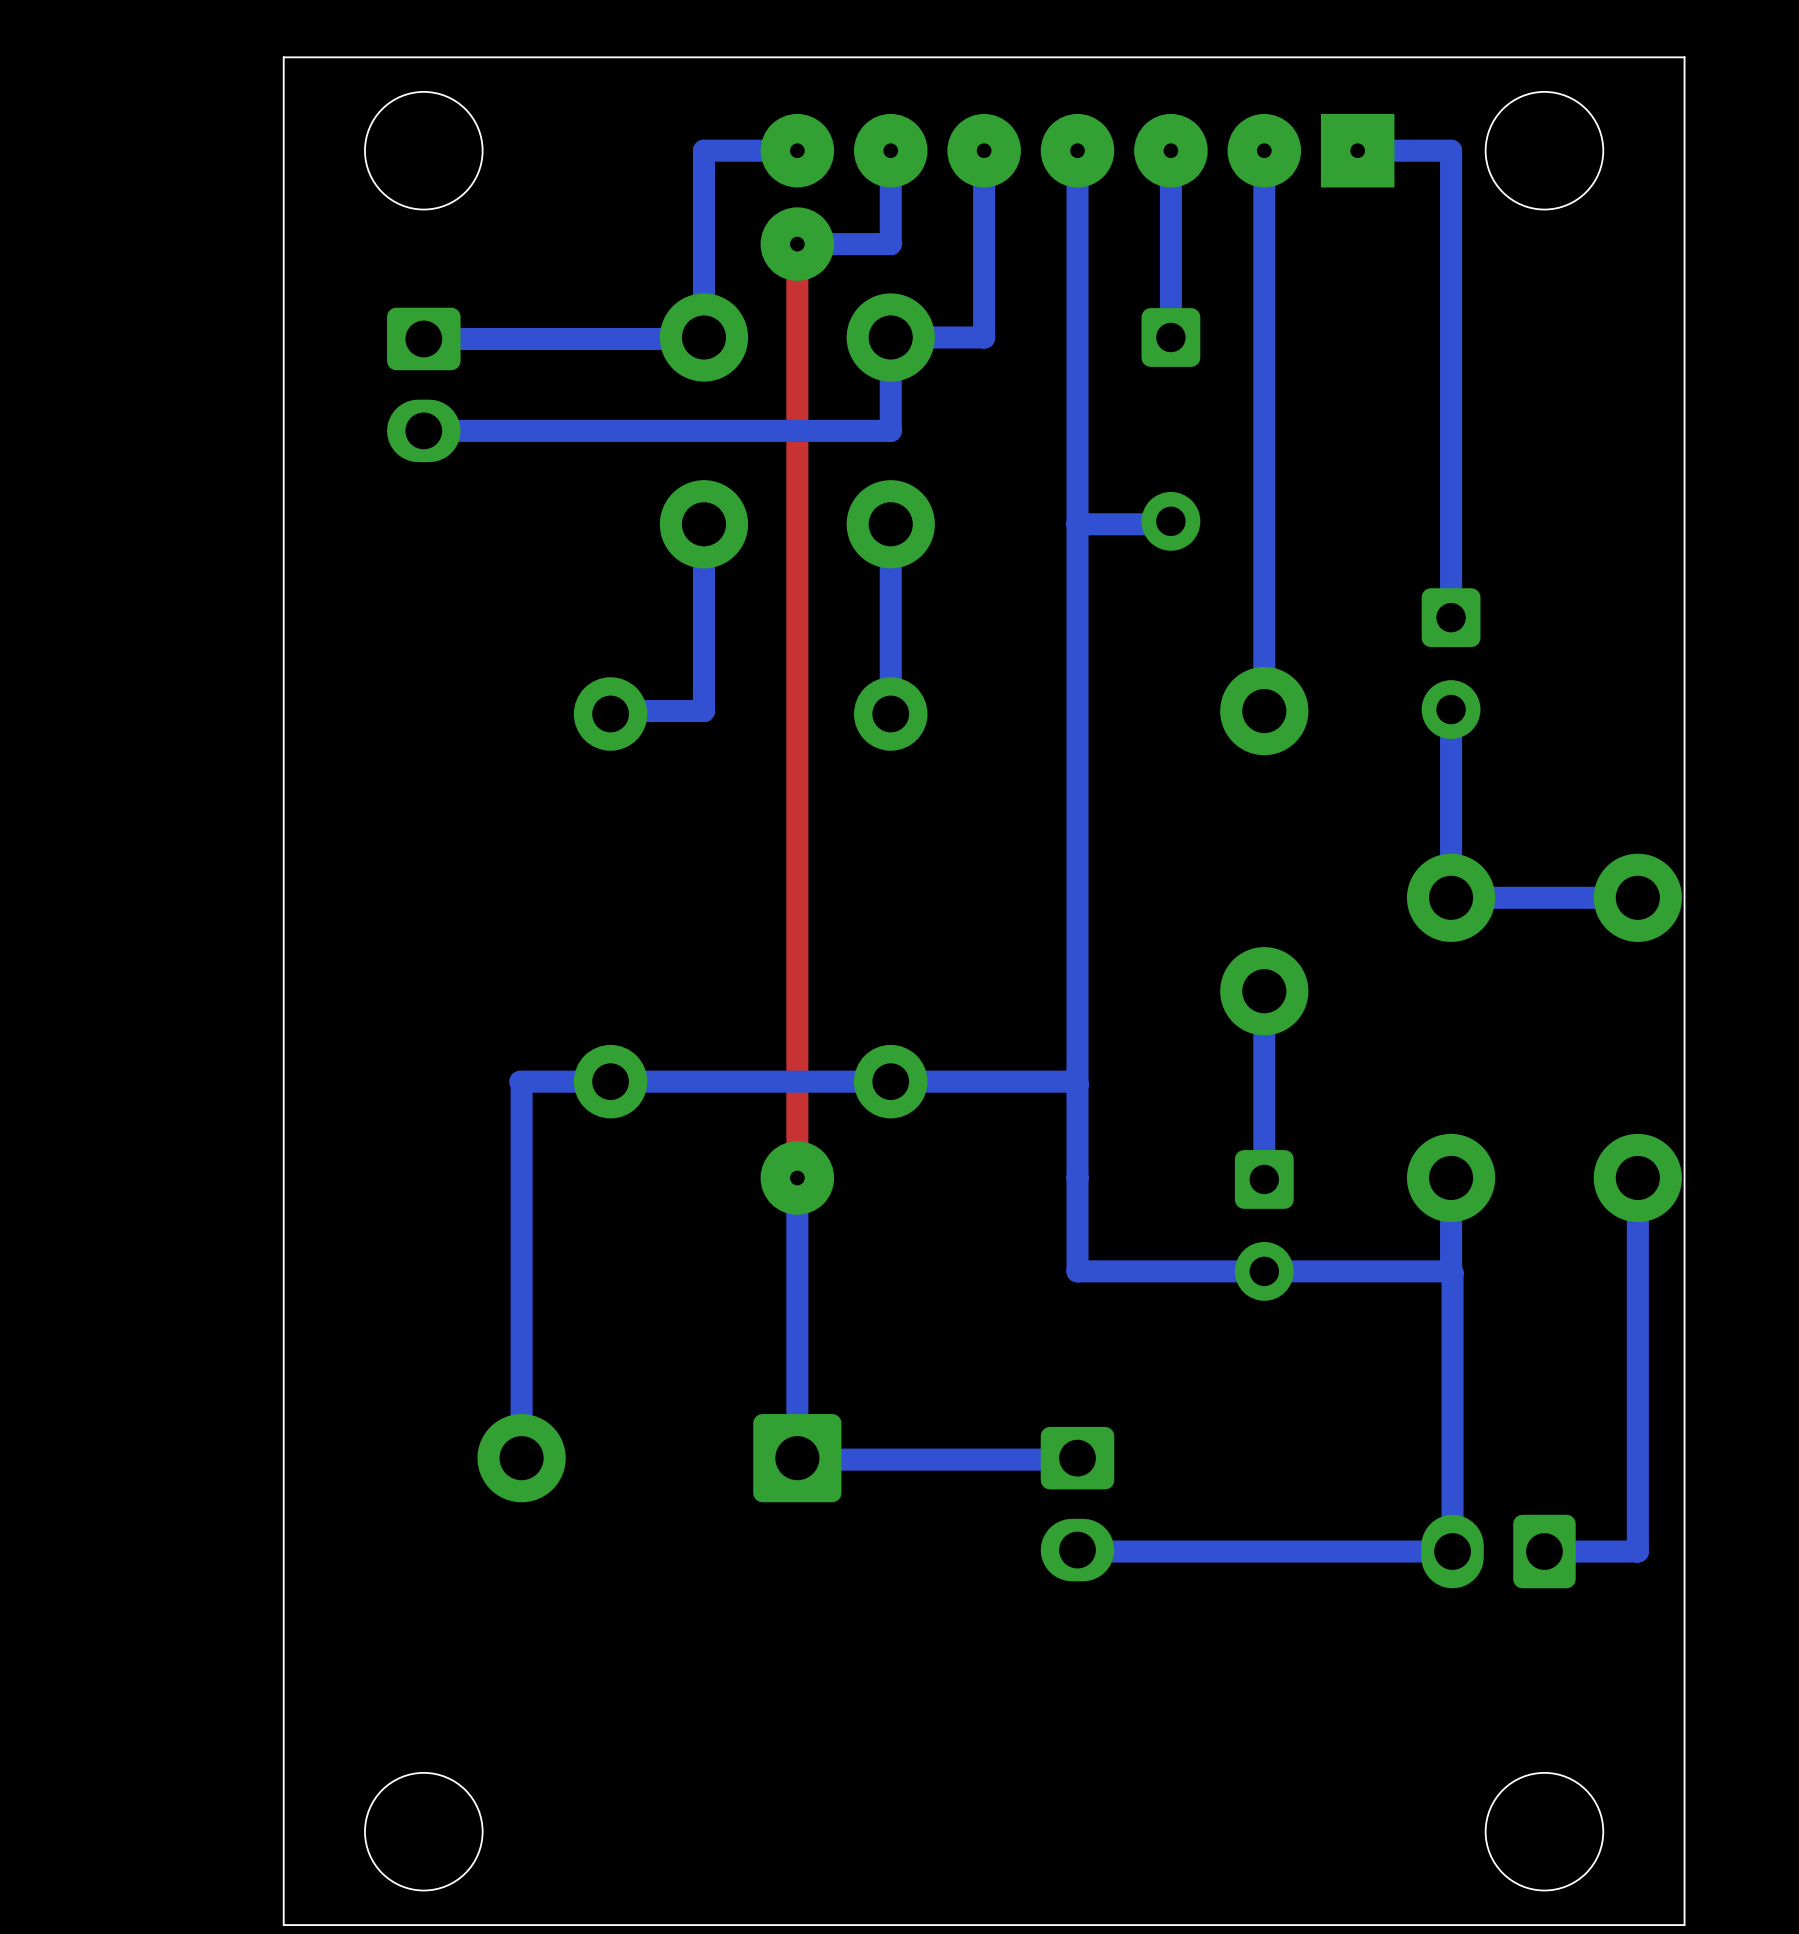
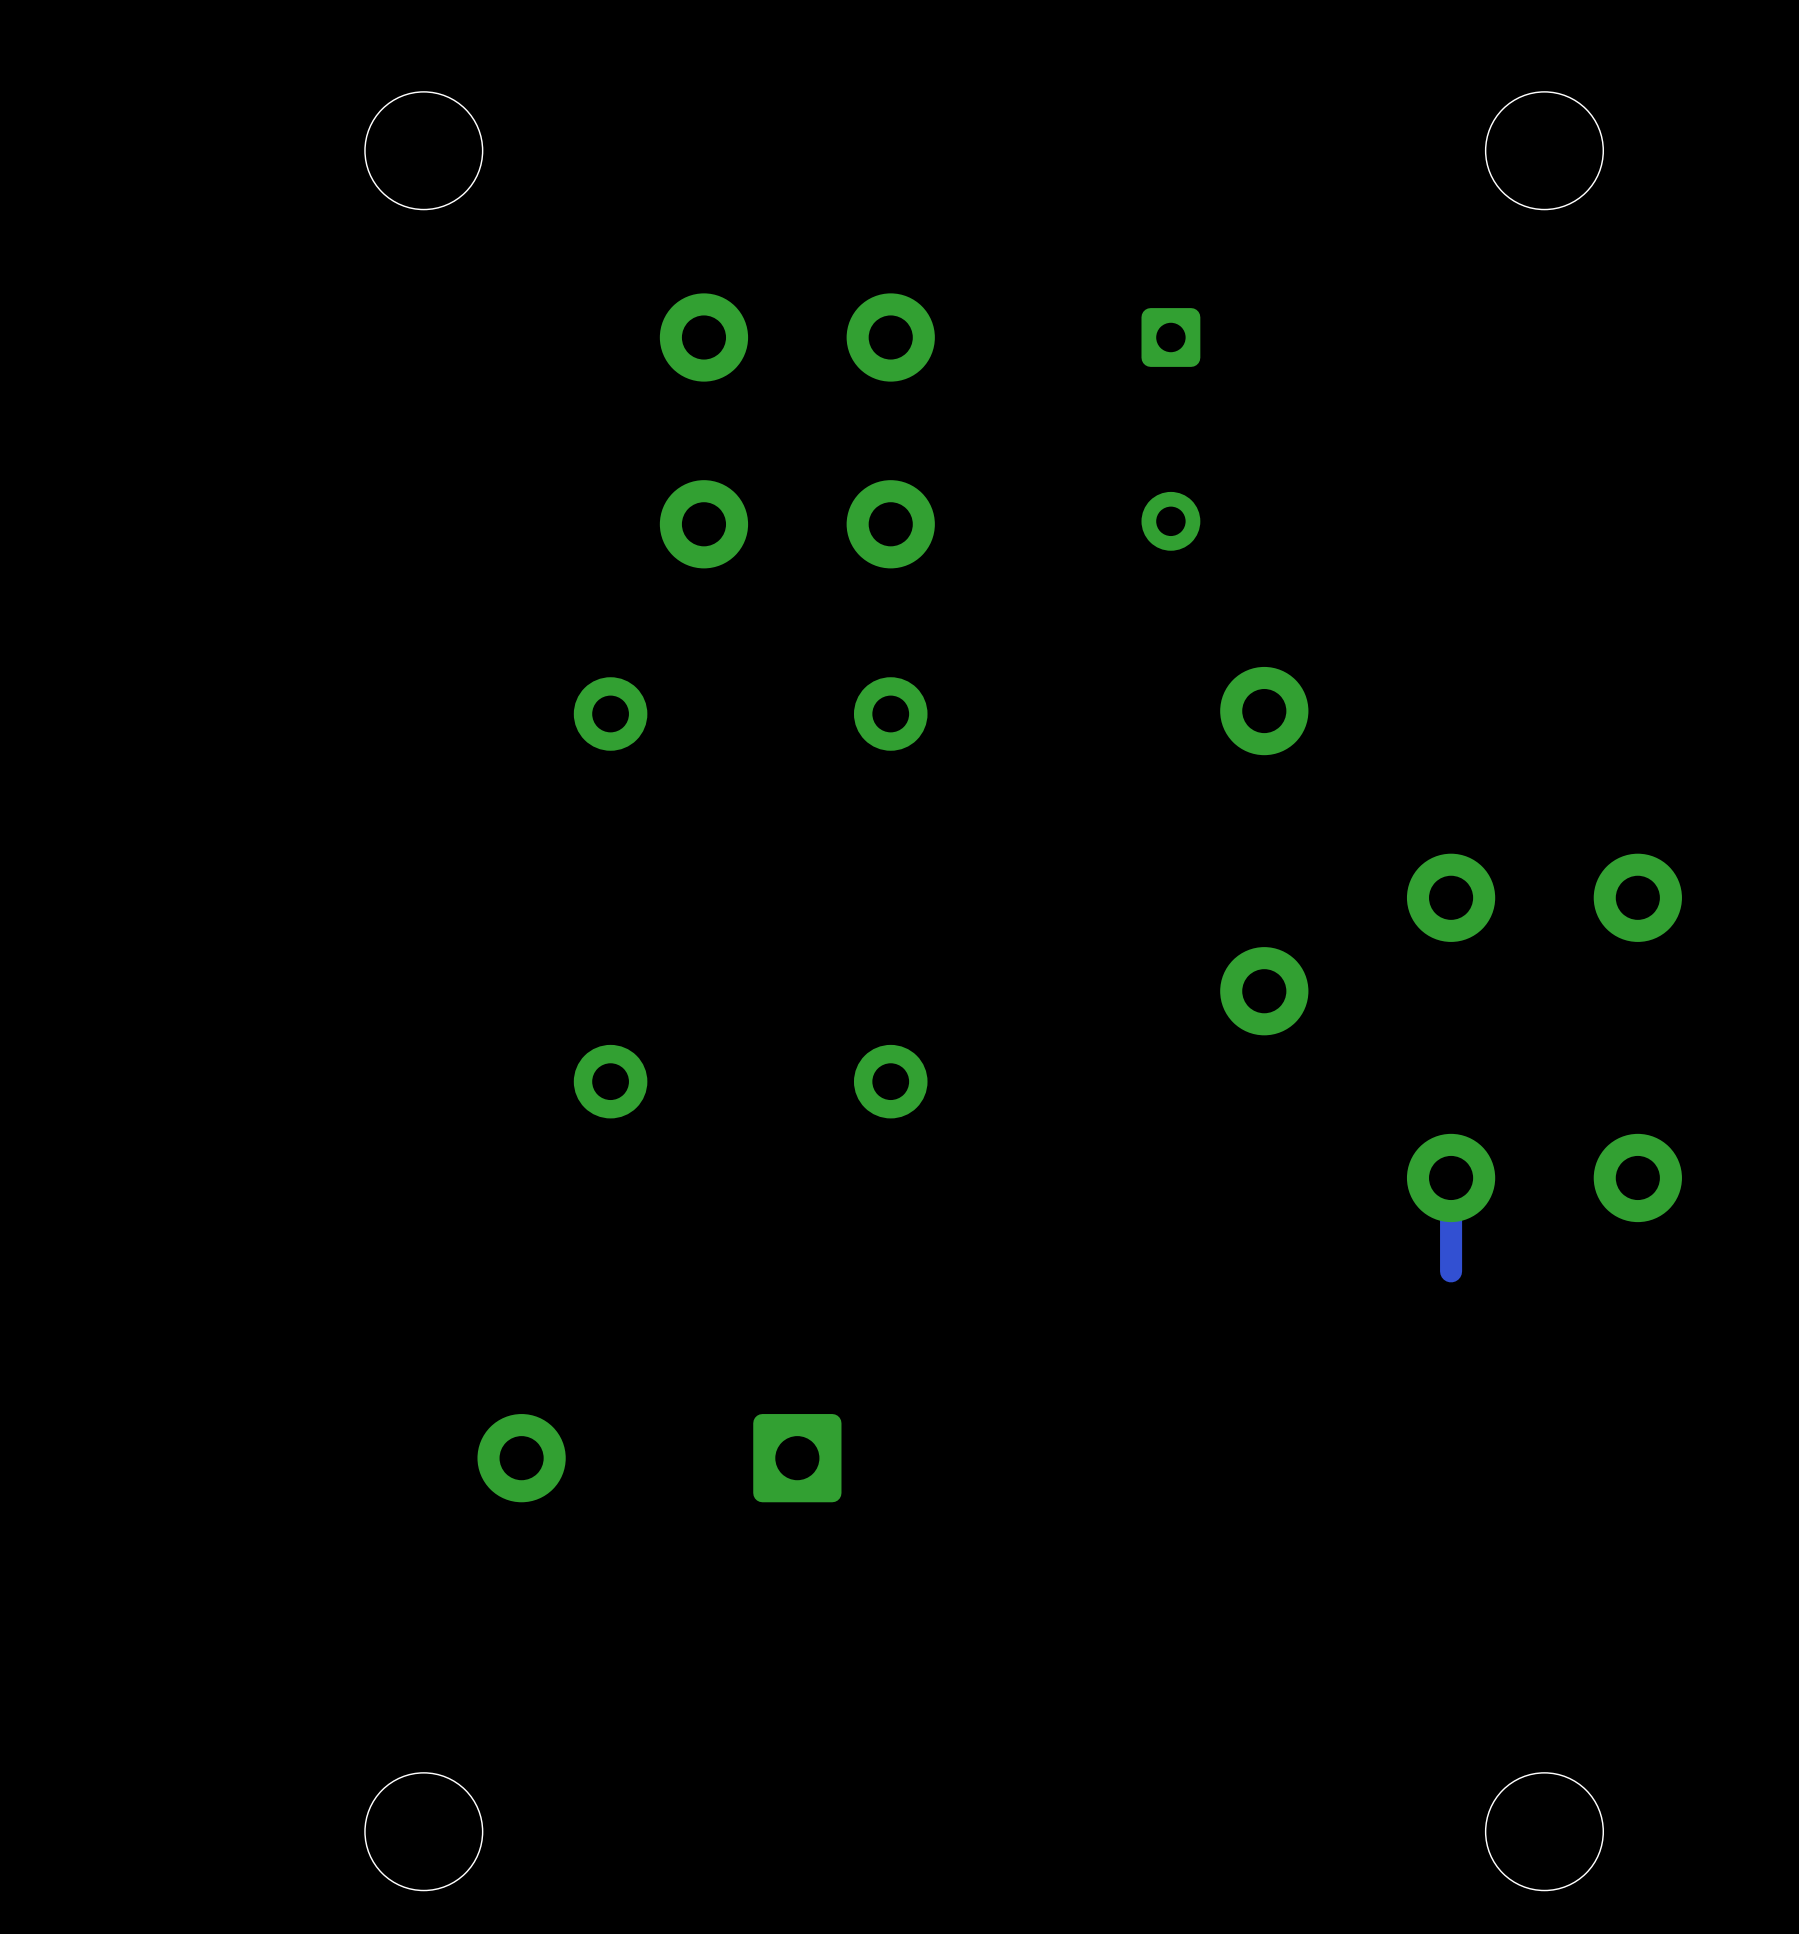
board edge: (1684, 57) (283, 57) (283, 1925) (1684, 1925) (1684, 57) -> none
bottom track: (797, 150) (703, 150) (702, 338) (423, 338) -> none
bottom track: (890, 150) (890, 244) (797, 244) -> none
bottom track: (984, 150) (984, 337) (890, 337) (890, 430) (423, 430) -> none
bottom track: (1077, 150) (1077, 1271) (1451, 1271) (1452, 1551) (1077, 1550) -> none
part: (1077, 150) -> none
bottom track: (1170, 150) (1170, 337) -> none
bottom track: (1264, 150) (1264, 711) -> none
bottom track: (1357, 150) (1451, 150) (1451, 617) -> none
top track: (797, 244) (797, 1177) -> none
via: (797, 244) -> none
part: (423, 384) -> none
bottom track: (1170, 521) (1167, 524) (1077, 524) -> none
bottom track: (703, 524) (703, 711) (613, 711) (610, 713) -> none
bottom track: (890, 524) (890, 713) -> none
part: (1451, 663) -> none
bottom track: (1451, 709) (1451, 897) (1637, 897) -> none
bottom track: (1264, 991) (1264, 1179) -> none
bottom track: (520, 1081) (1074, 1081) (1077, 1084) -> none
bottom track: (521, 1089) (521, 1458) -> none
bottom track: (797, 1177) (797, 1458) (1077, 1458) -> none
via: (797, 1177) -> none
bottom track: (1637, 1177) (1637, 1551) (1544, 1551) -> none
part: (1264, 1225) -> none
part: (1077, 1504) -> none
part: (1498, 1551) -> none

